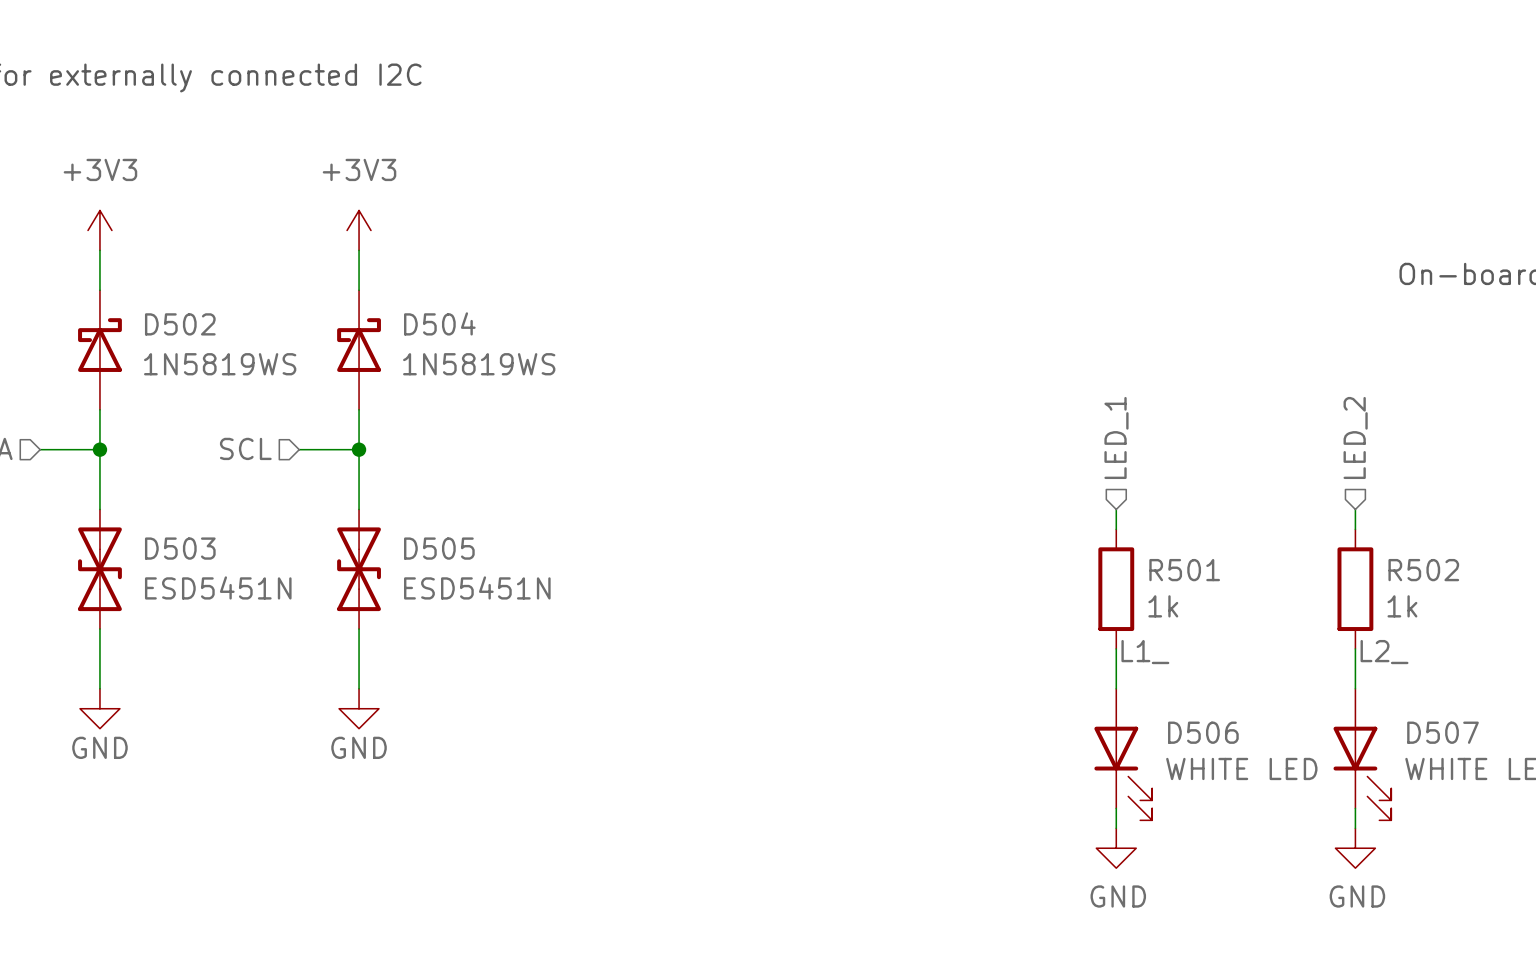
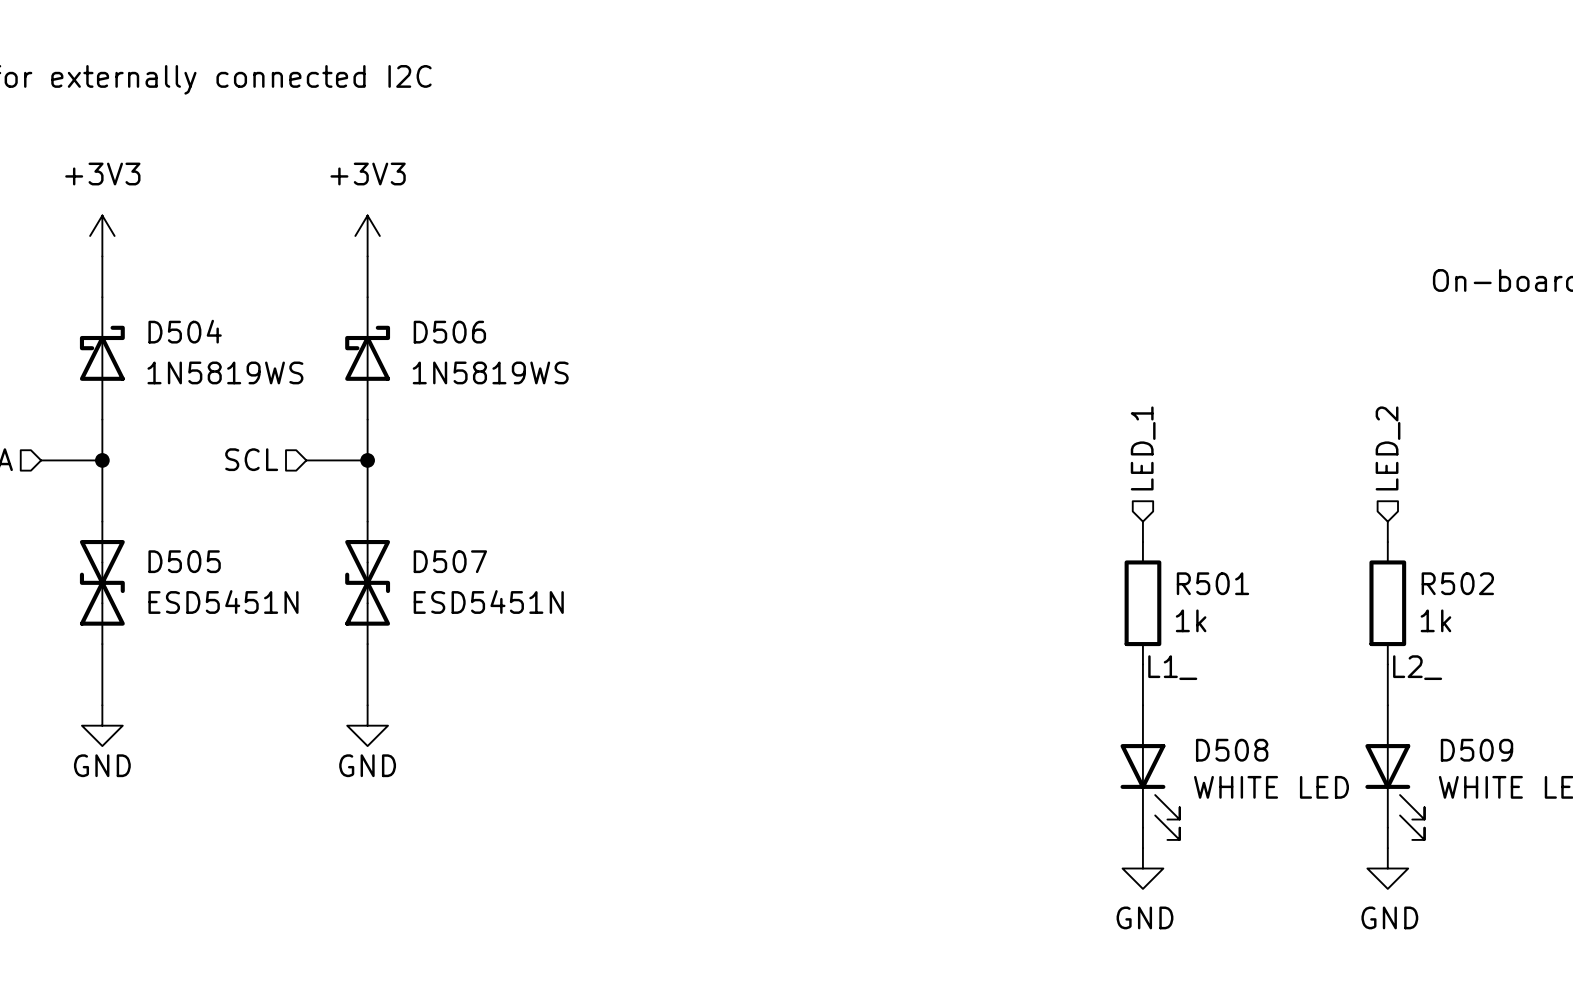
D504 name: D504 (439, 323) -> D506 (449, 332)
D502 name: D502 (180, 324) -> D504 (185, 331)
D503 name: D503 (180, 548) -> D505 (184, 561)
D505 name: D505 (439, 548) -> D507 (450, 561)
D506 name: D506 (1203, 732) -> D508 (1232, 750)
D507 name: D507 (1442, 732) -> D509 (1477, 750)

